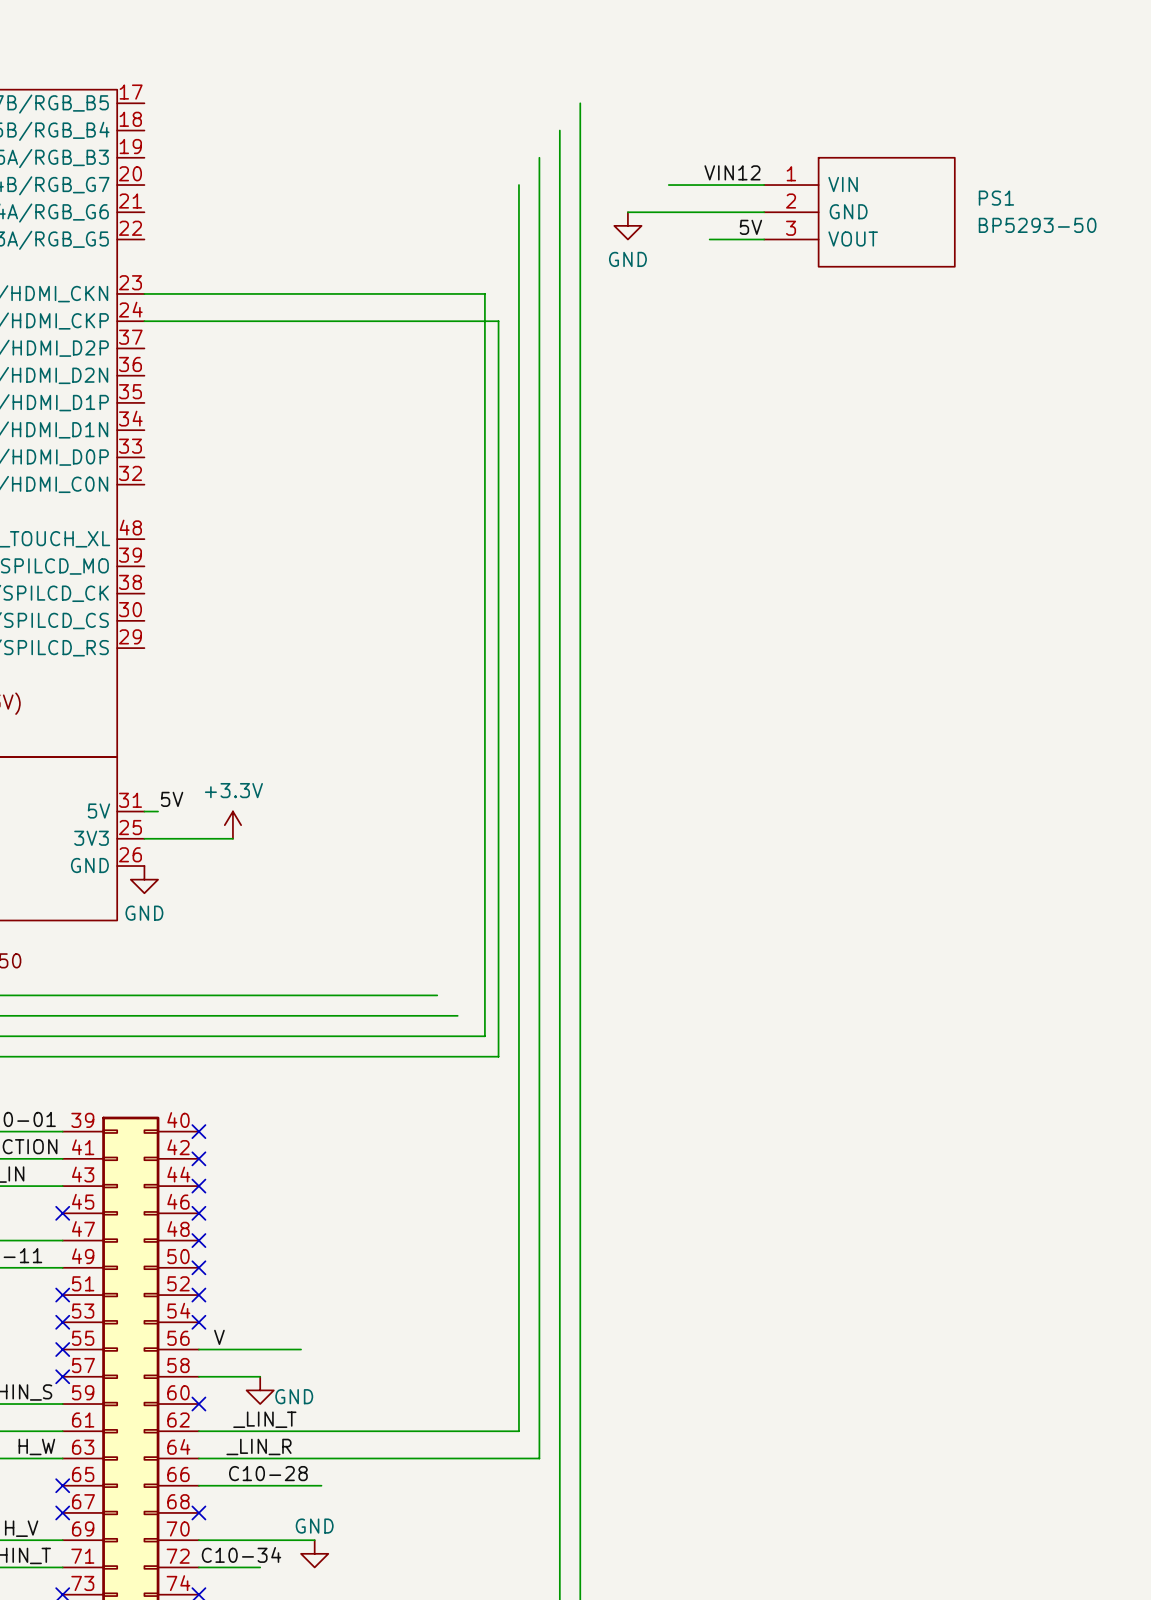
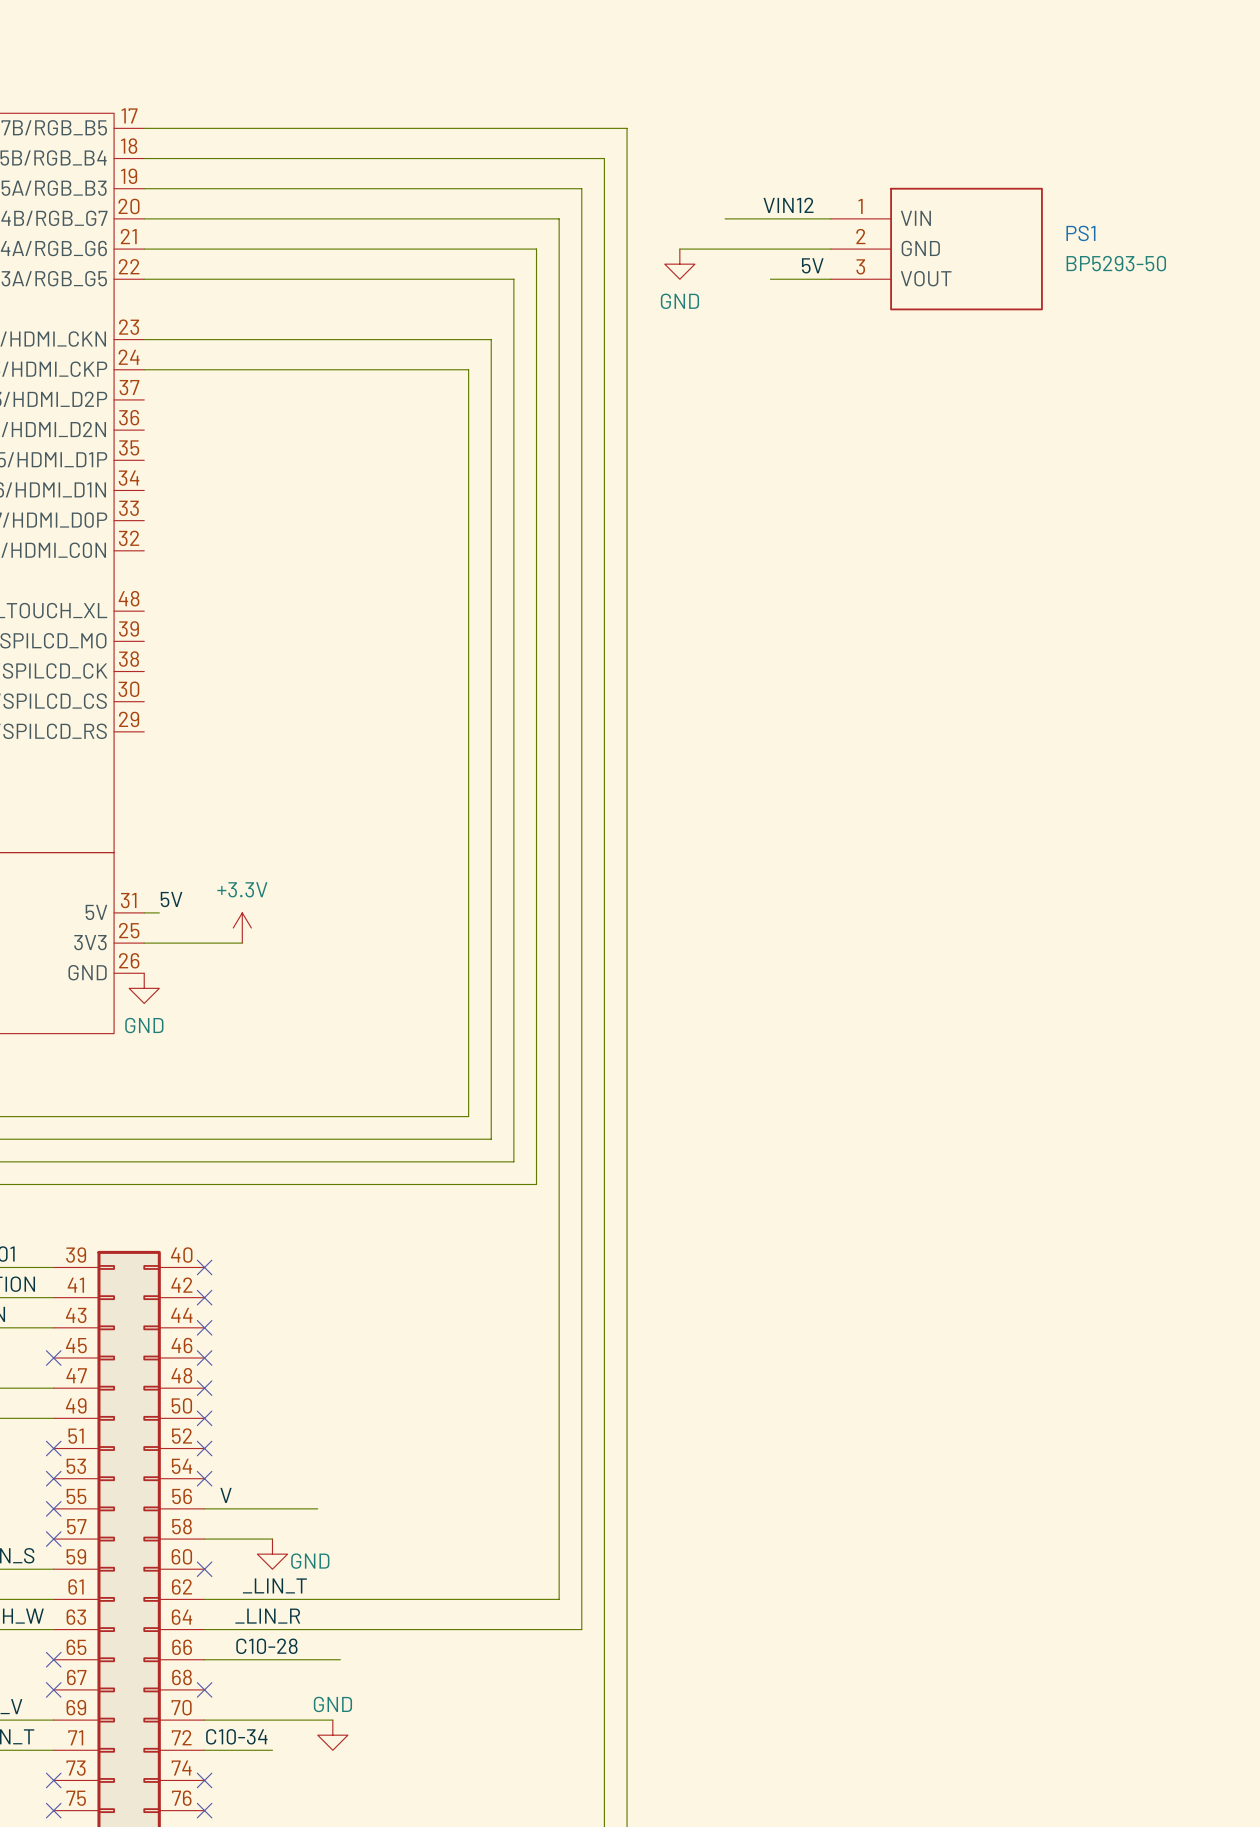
wire: none -> (144, 128) (627, 128)
wire: none -> (144, 158) (604, 158)
wire: none -> (144, 188) (581, 188)
wire: none -> (144, 218) (559, 218)
wire: none -> (144, 279) (513, 279) (513, 1161)
wire: (457, 293) (484, 293) (484, 1036) (478, 1036) -> (491, 339) (491, 1139)
wire: (437, 321) (498, 321) -> (144, 249) (536, 249) (536, 369)
wire: none -> (468, 369) (468, 1116)

